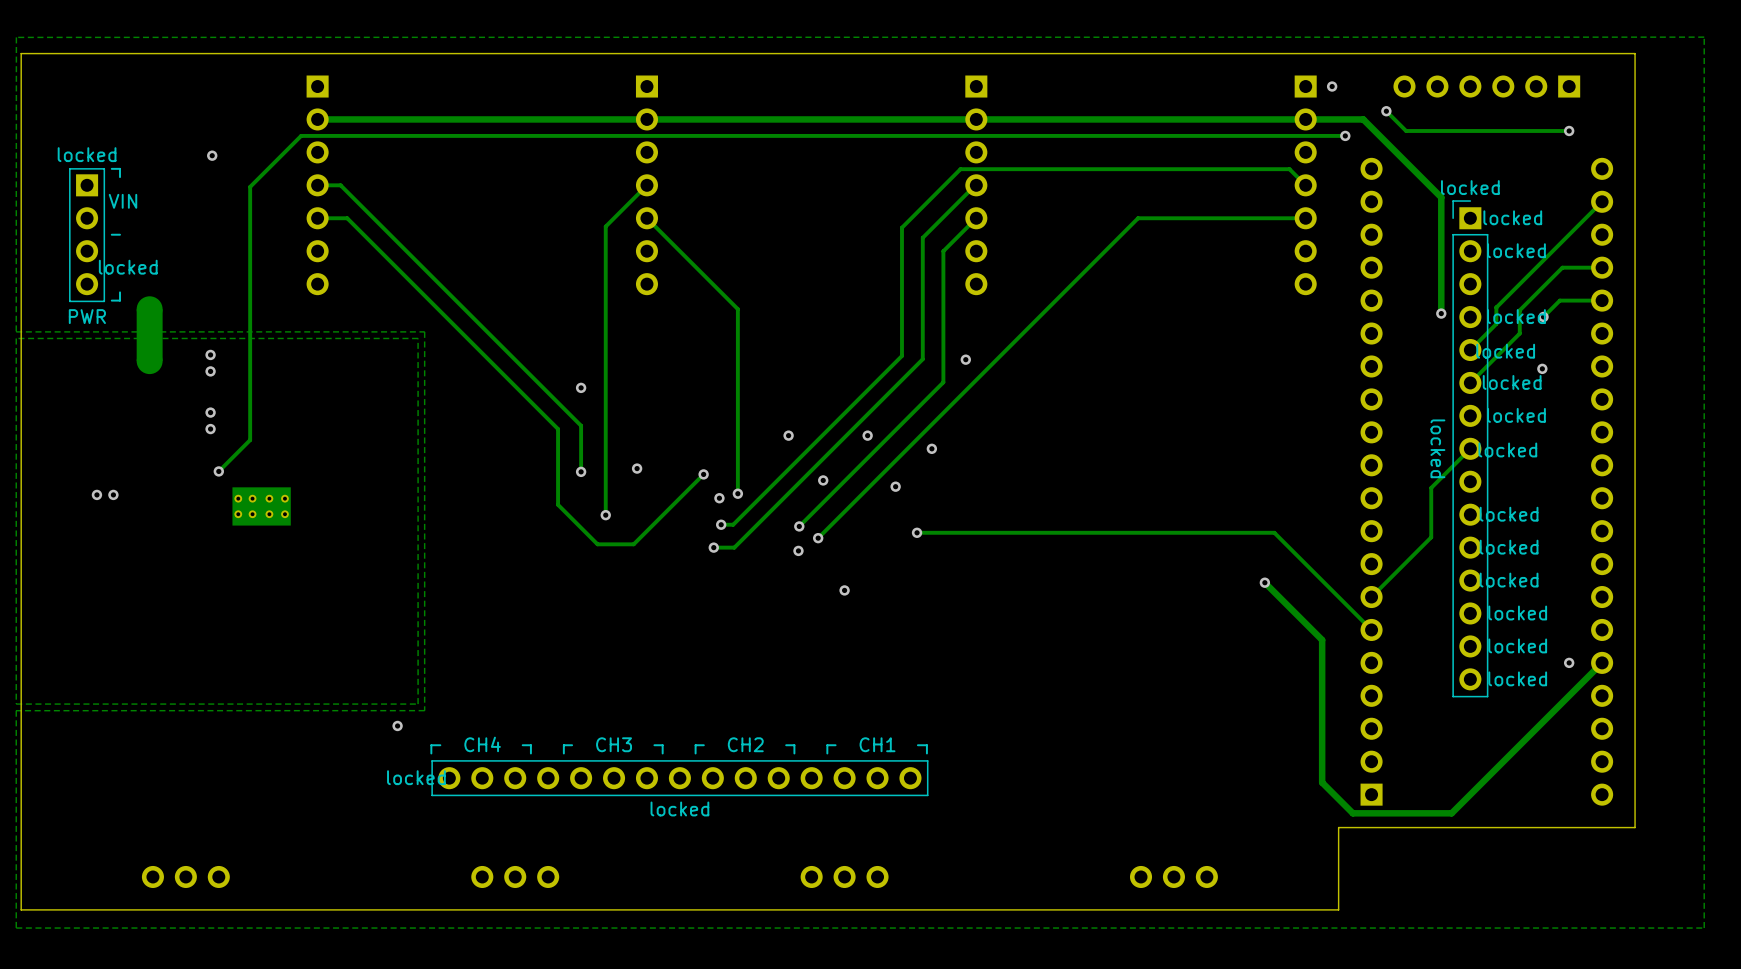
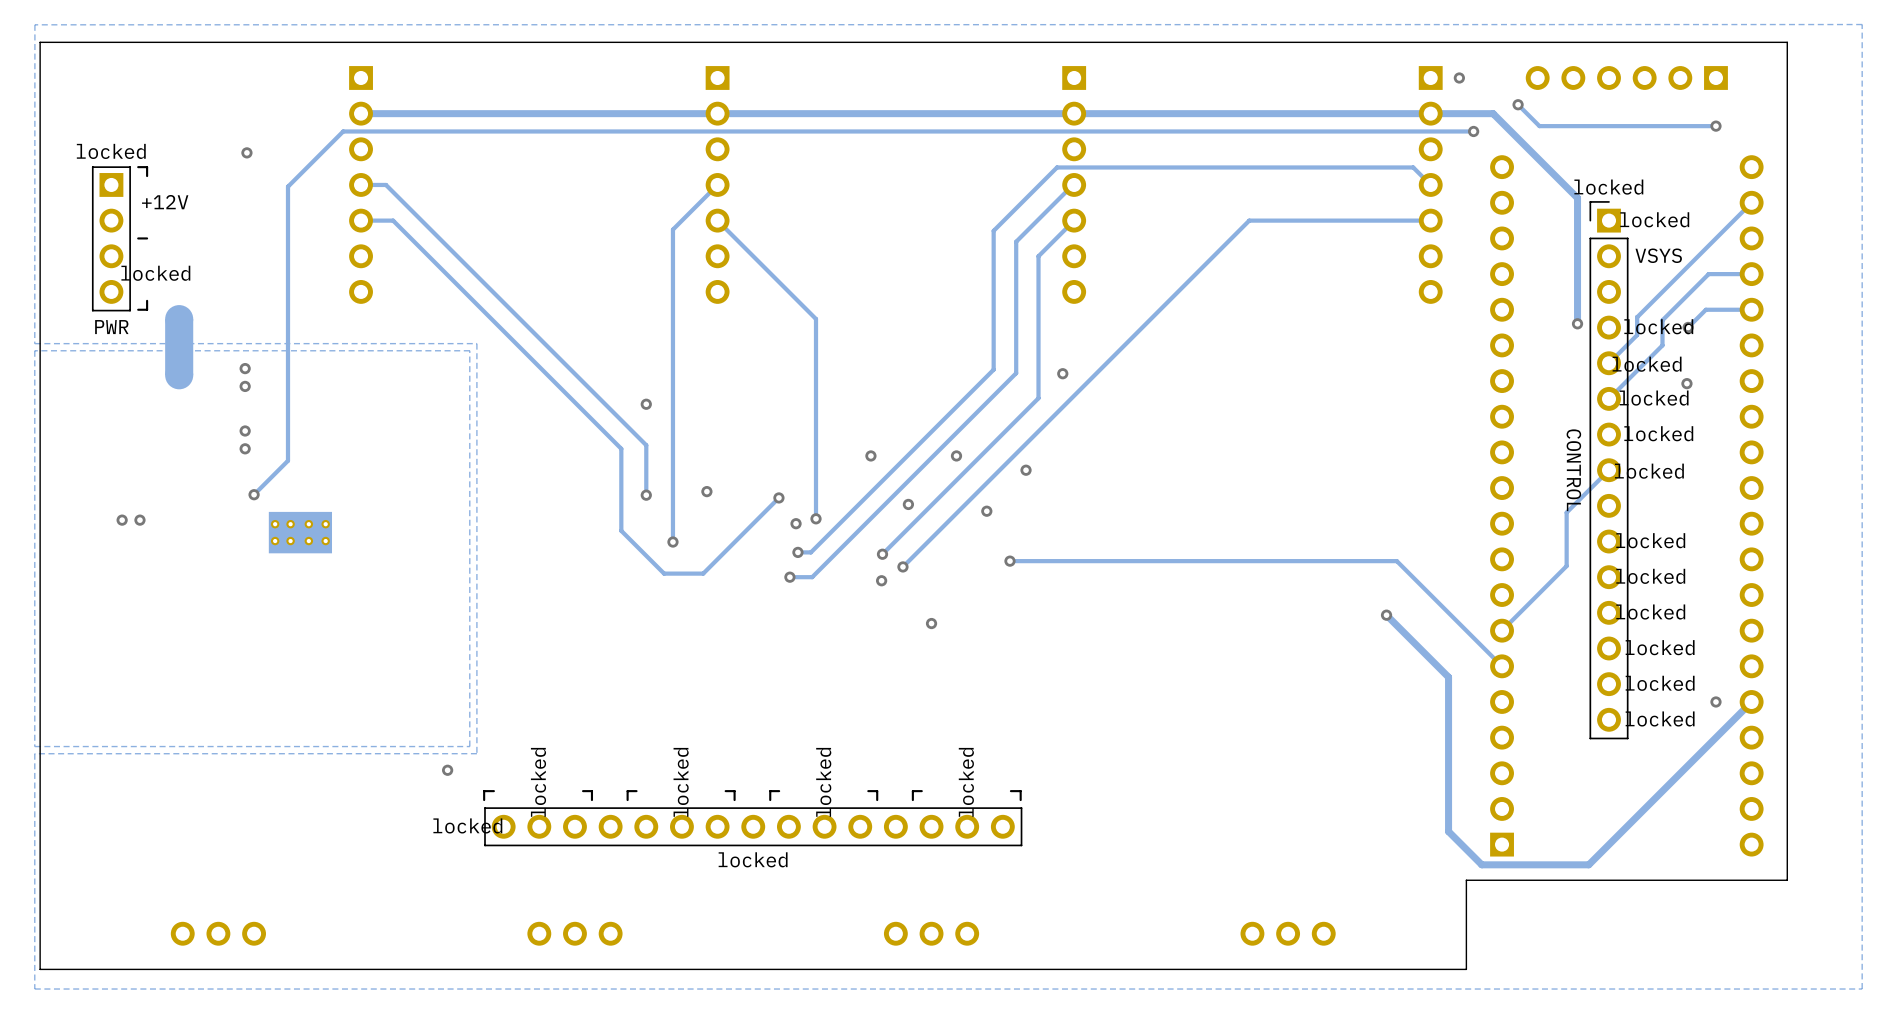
locked text: VIN (122, 201) -> none
locked text: none -> +12V (165, 202)
locked text: locked (1516, 250) -> VSYS (1658, 255)
locked value: locked (1437, 448) -> CONTROL (1573, 470)
locked text: none -> locked (538, 782)
locked text: none -> locked (681, 782)
locked text: none -> locked (823, 782)
locked text: none -> locked (966, 782)
locked text: CH4 (482, 744) -> none
locked text: CH3 (614, 744) -> none
locked text: CH2 (745, 744) -> none
locked text: CH1 (877, 744) -> none

